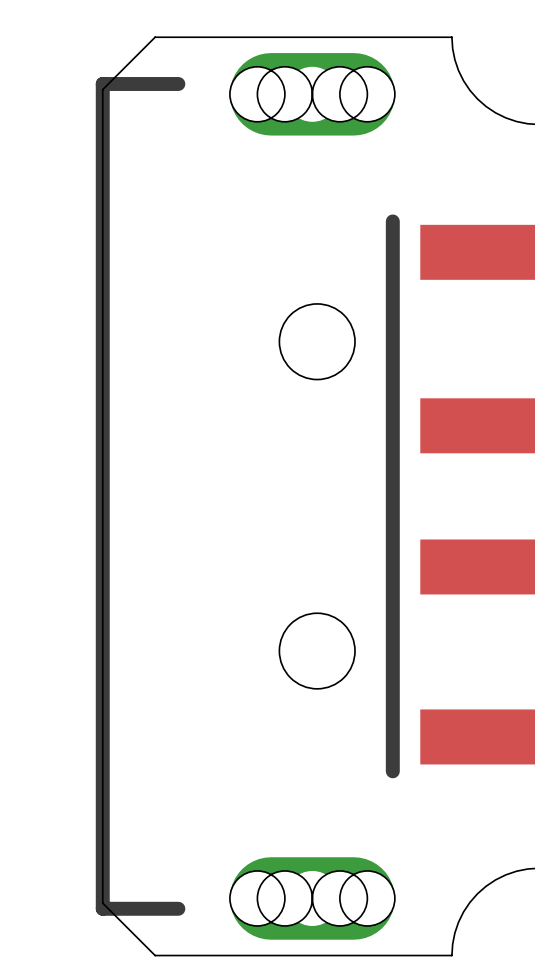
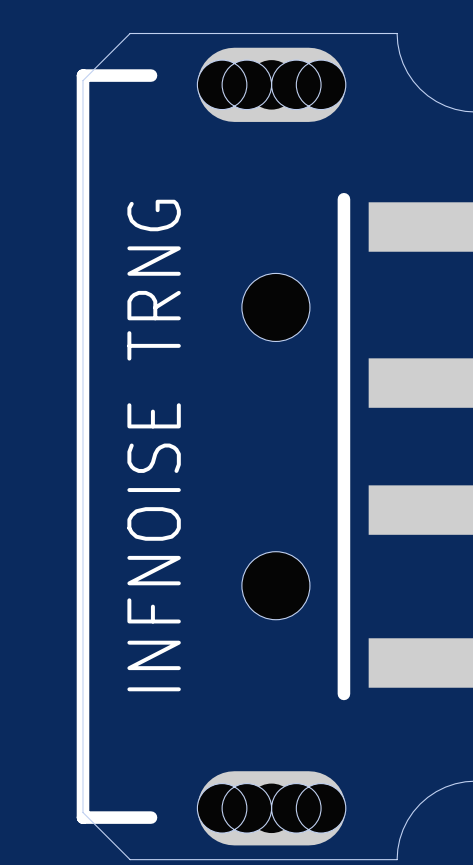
text: none -> INFNOISE TRNG (154, 445)

